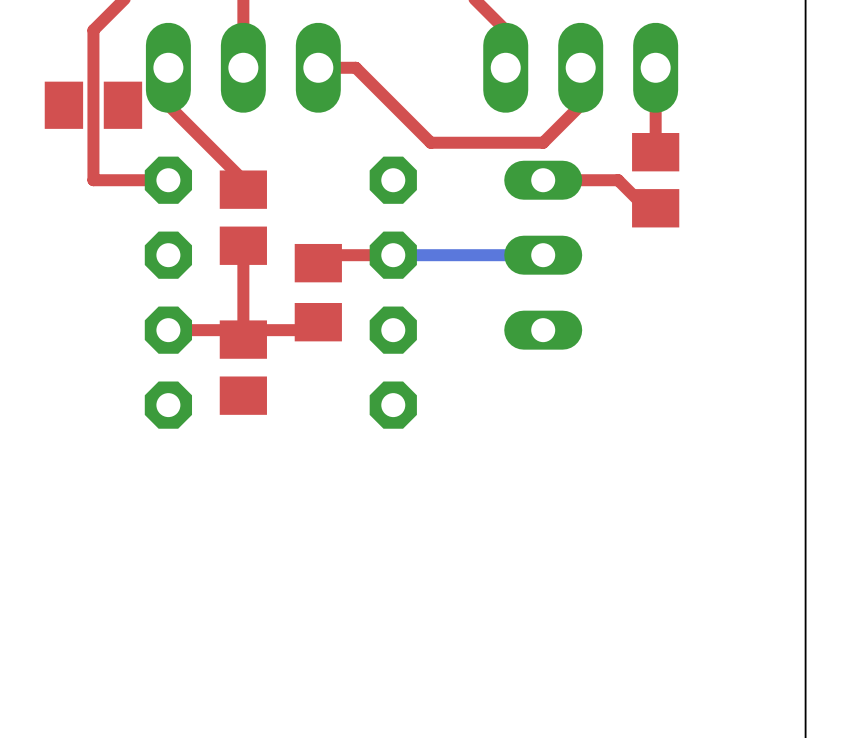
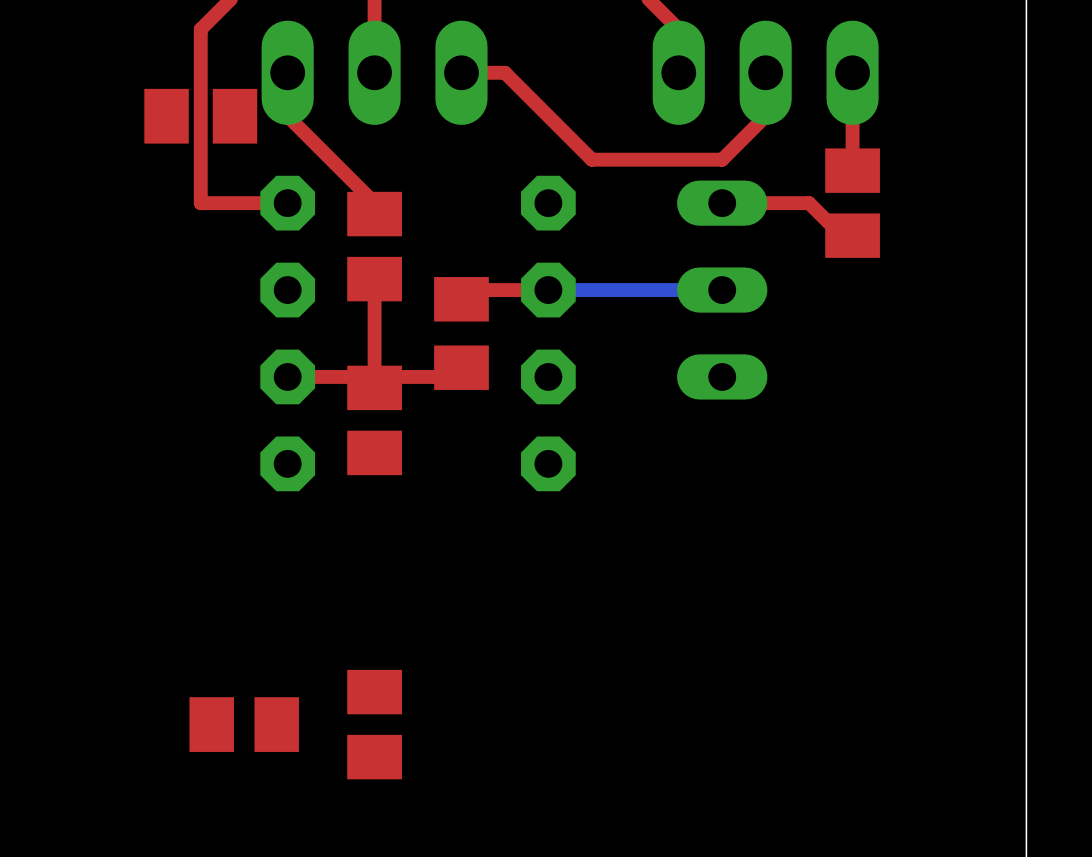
part: none -> (244, 724)
part: none -> (374, 724)

